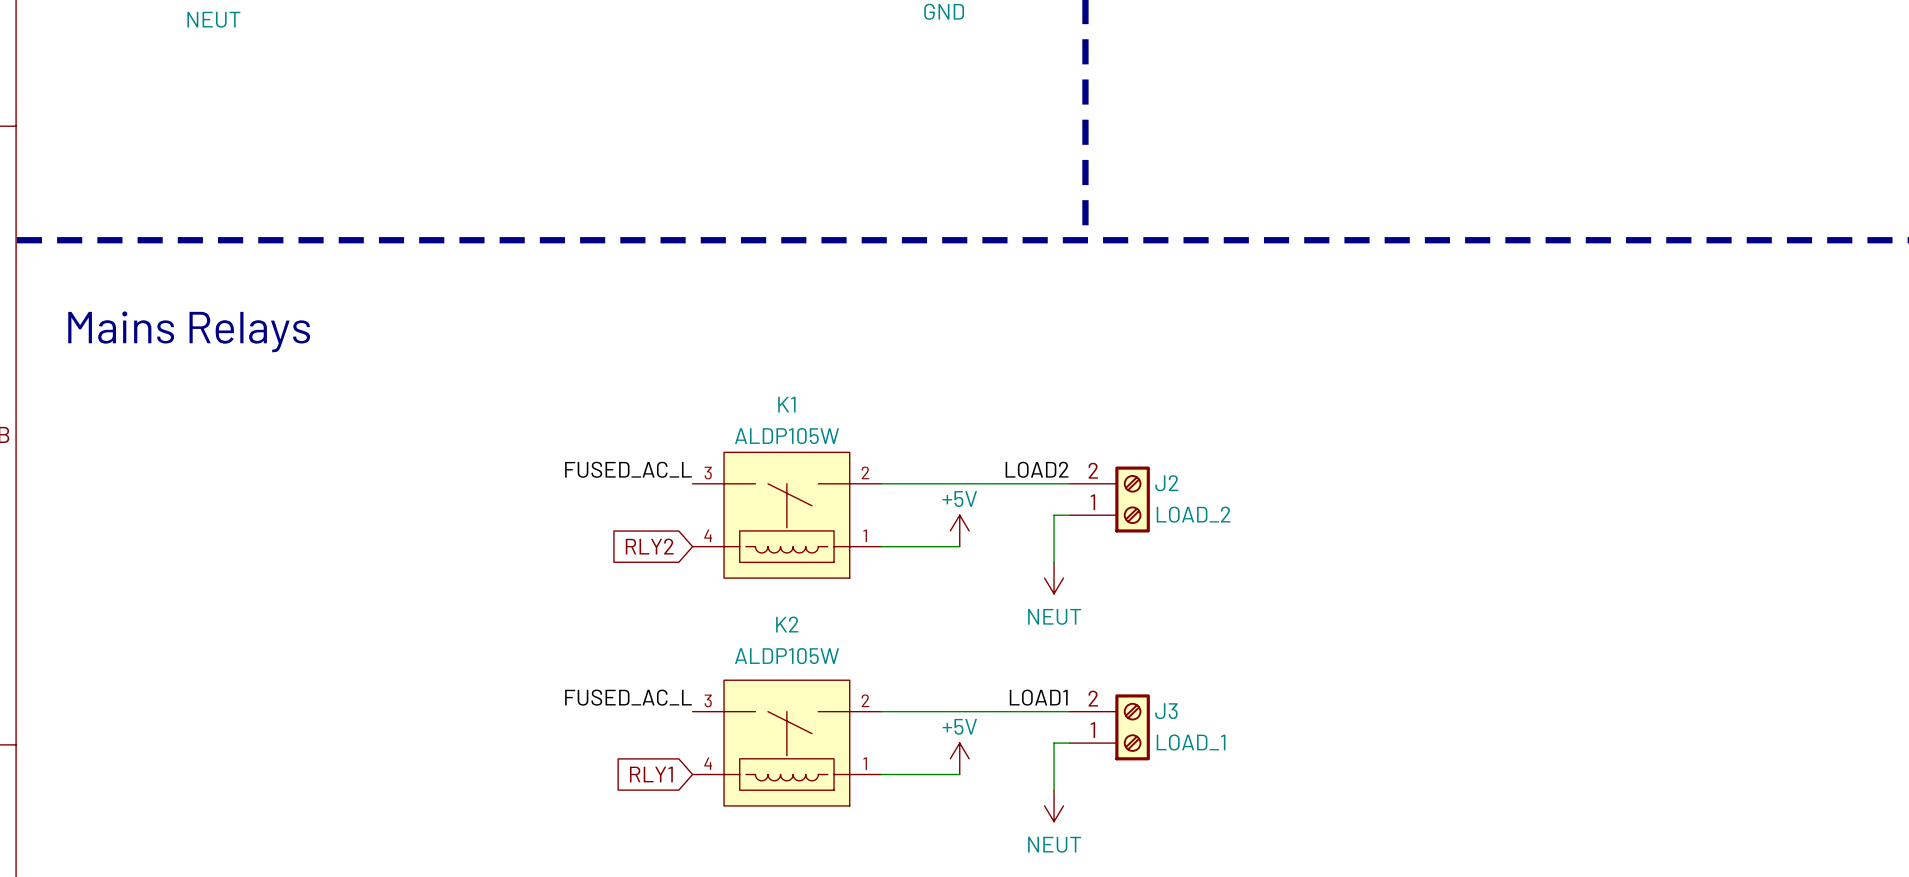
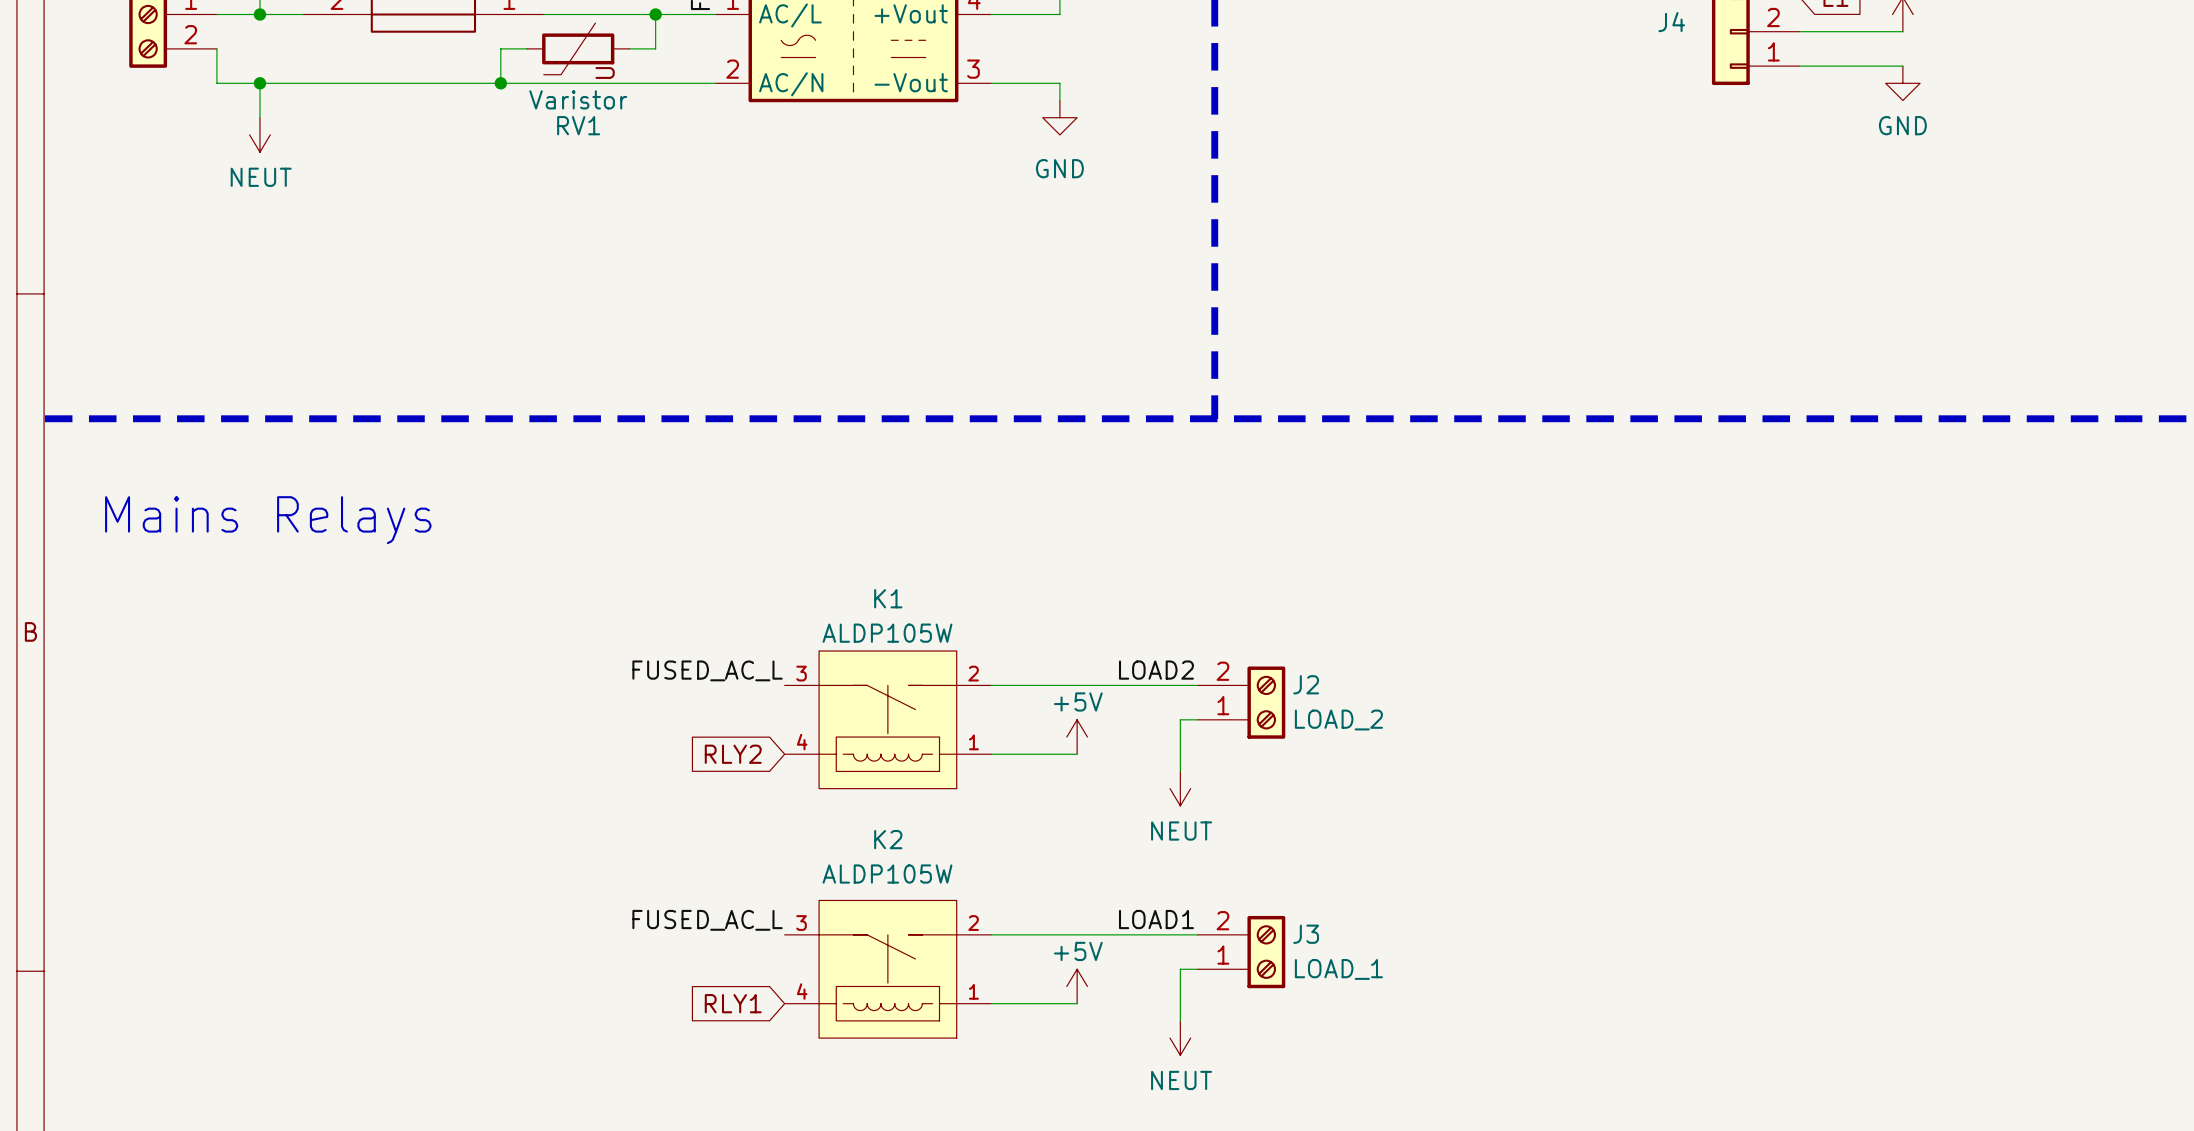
K1 symbol: [692, 452, 882, 579] -> [784, 651, 992, 789]
K2 symbol: [692, 680, 882, 806] -> [784, 900, 992, 1039]

